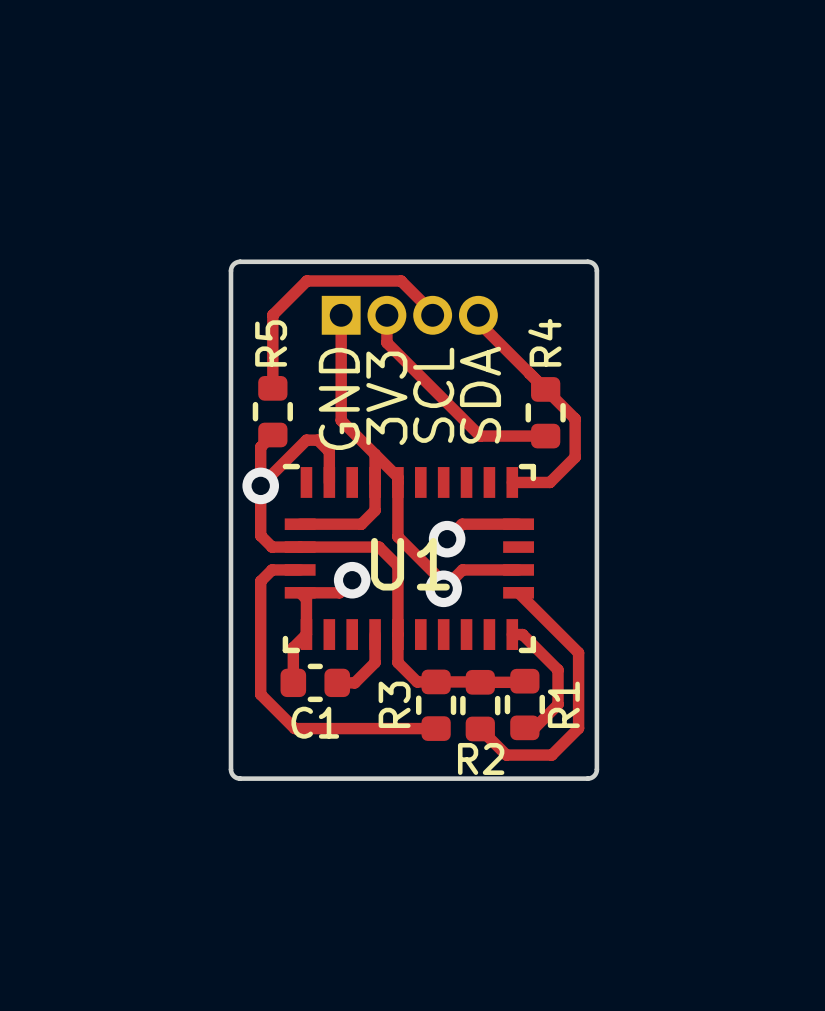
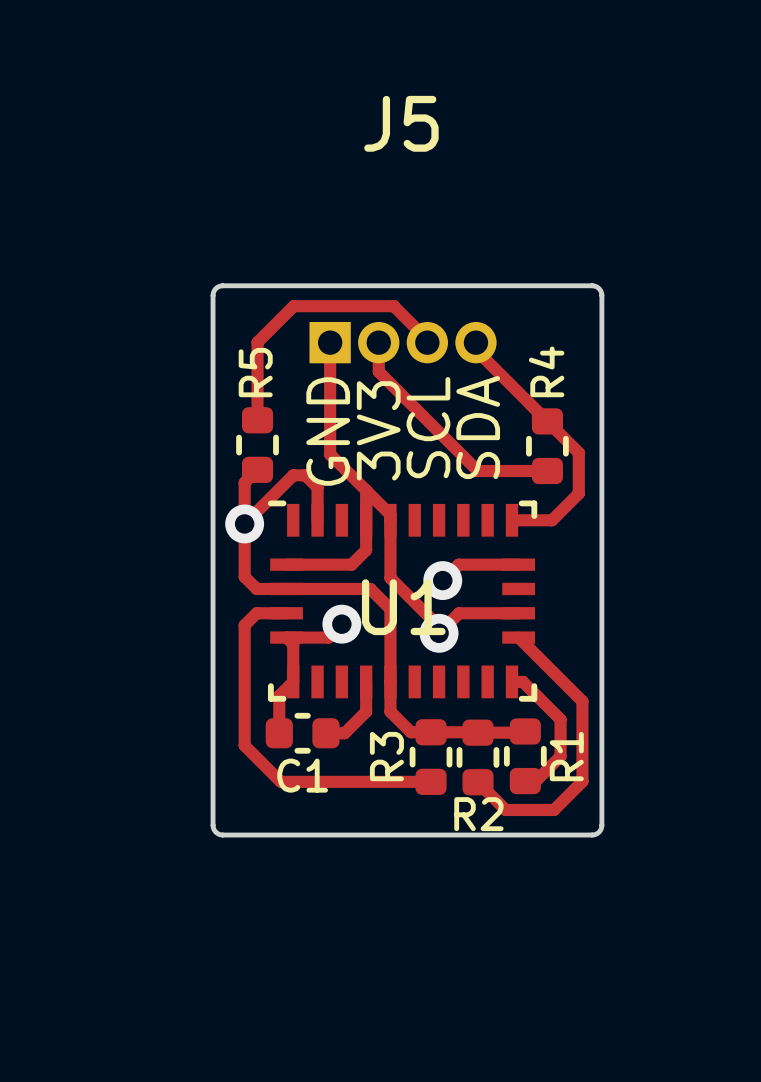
J5 name: none -> J5 (401, 123)

